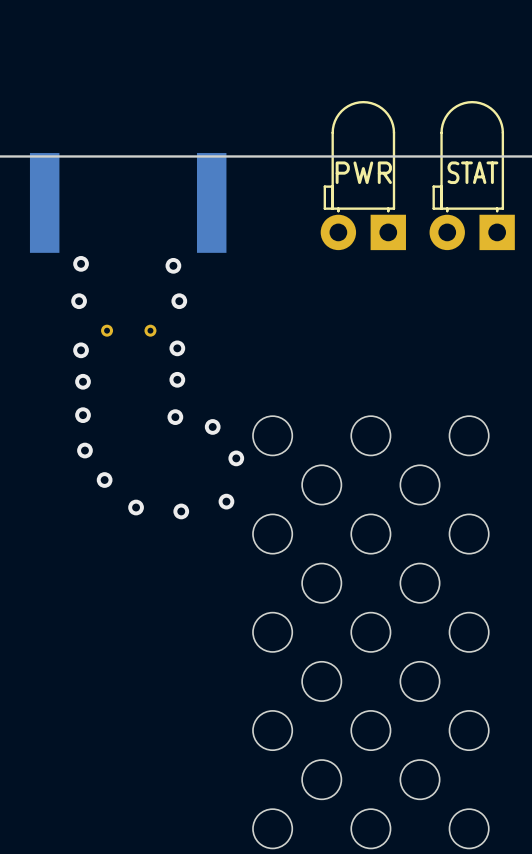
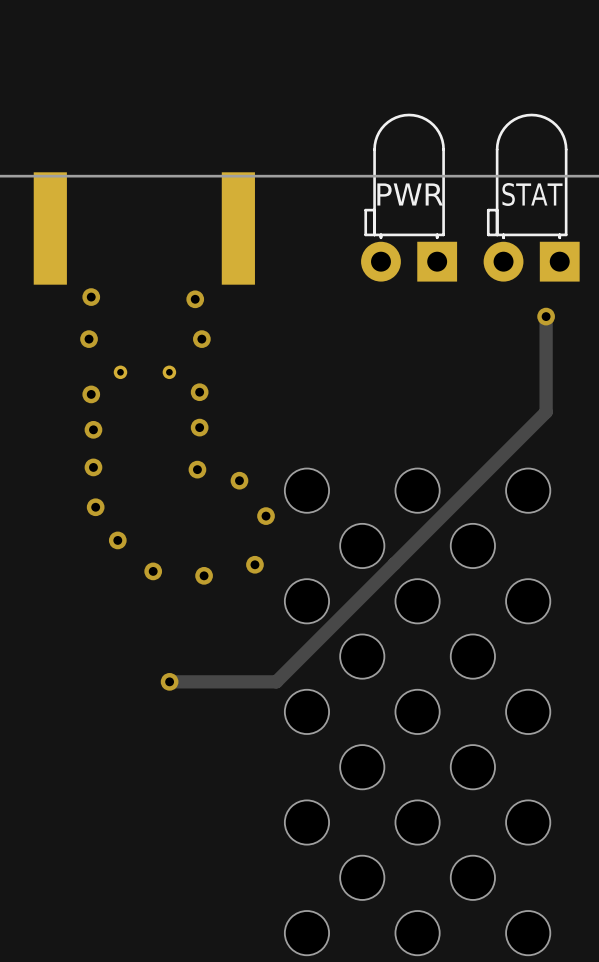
track: none -> (546, 316) (546, 412) (276, 681) (169, 681)
via: none -> (546, 316)
via: none -> (169, 681)

